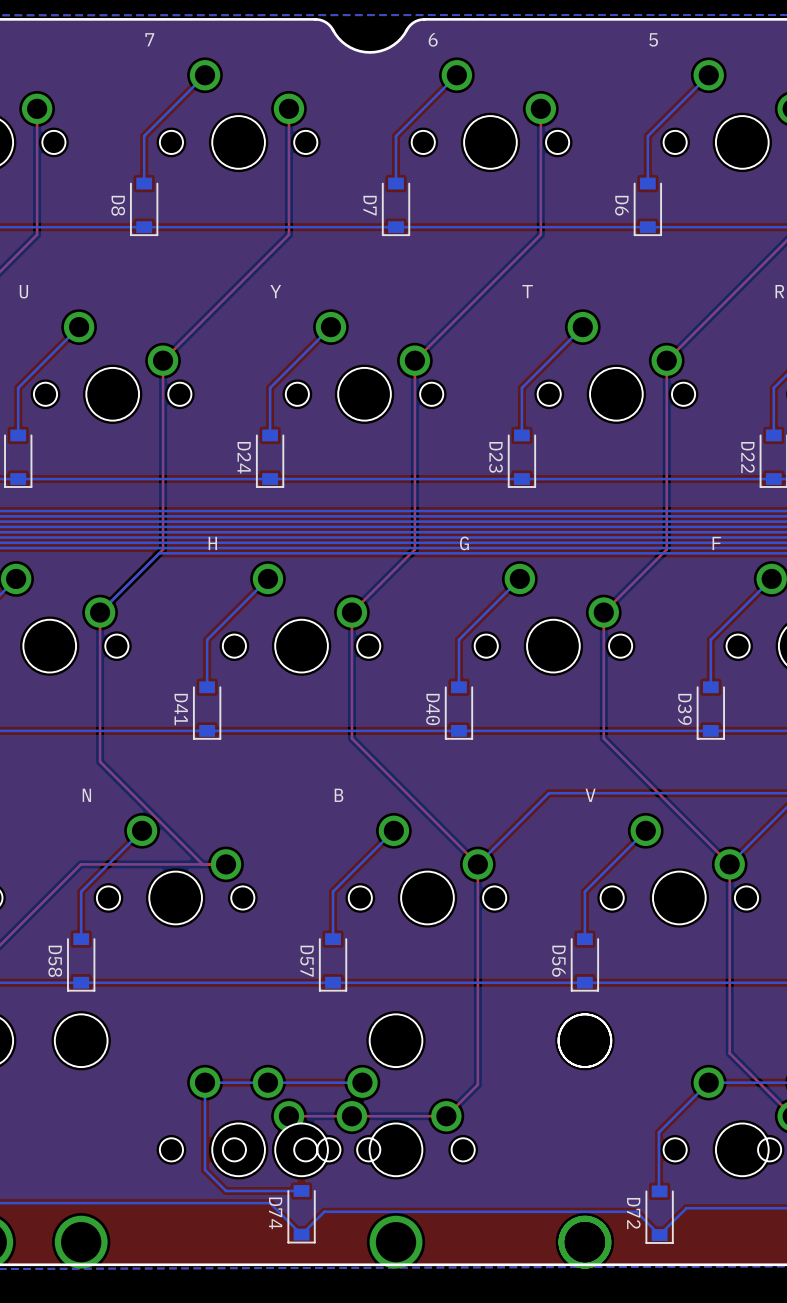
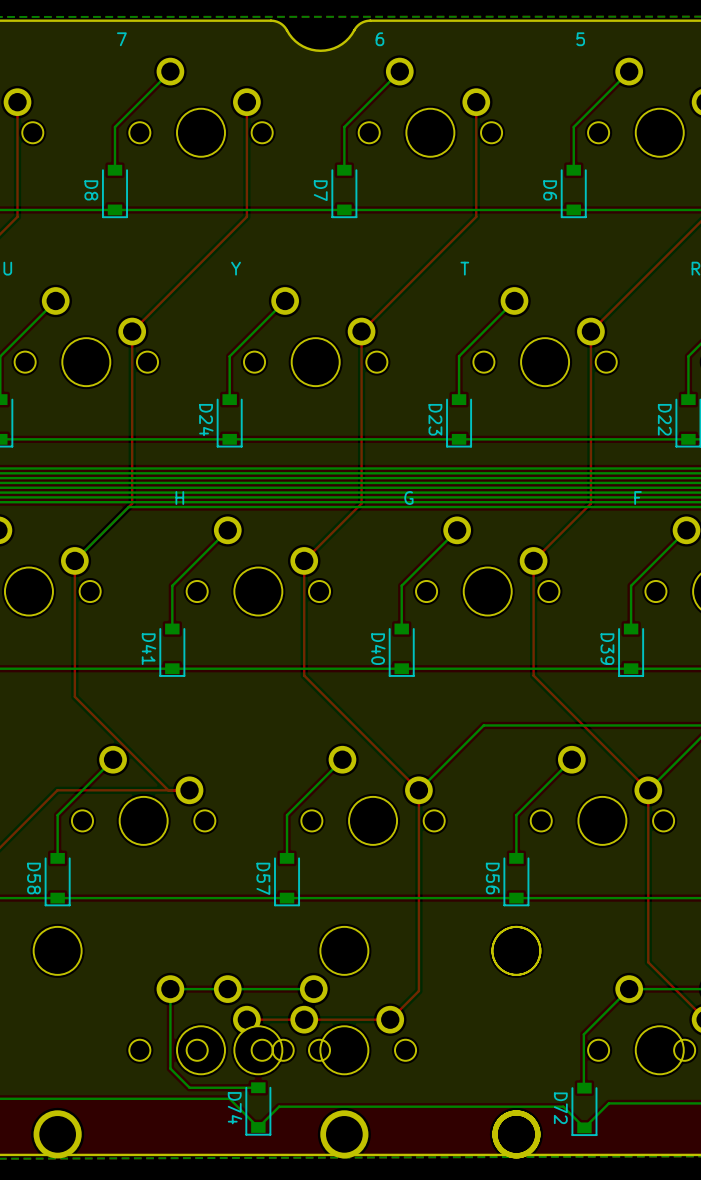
text: N (86, 795) -> none
text: B (339, 795) -> none
text: V (590, 795) -> none

